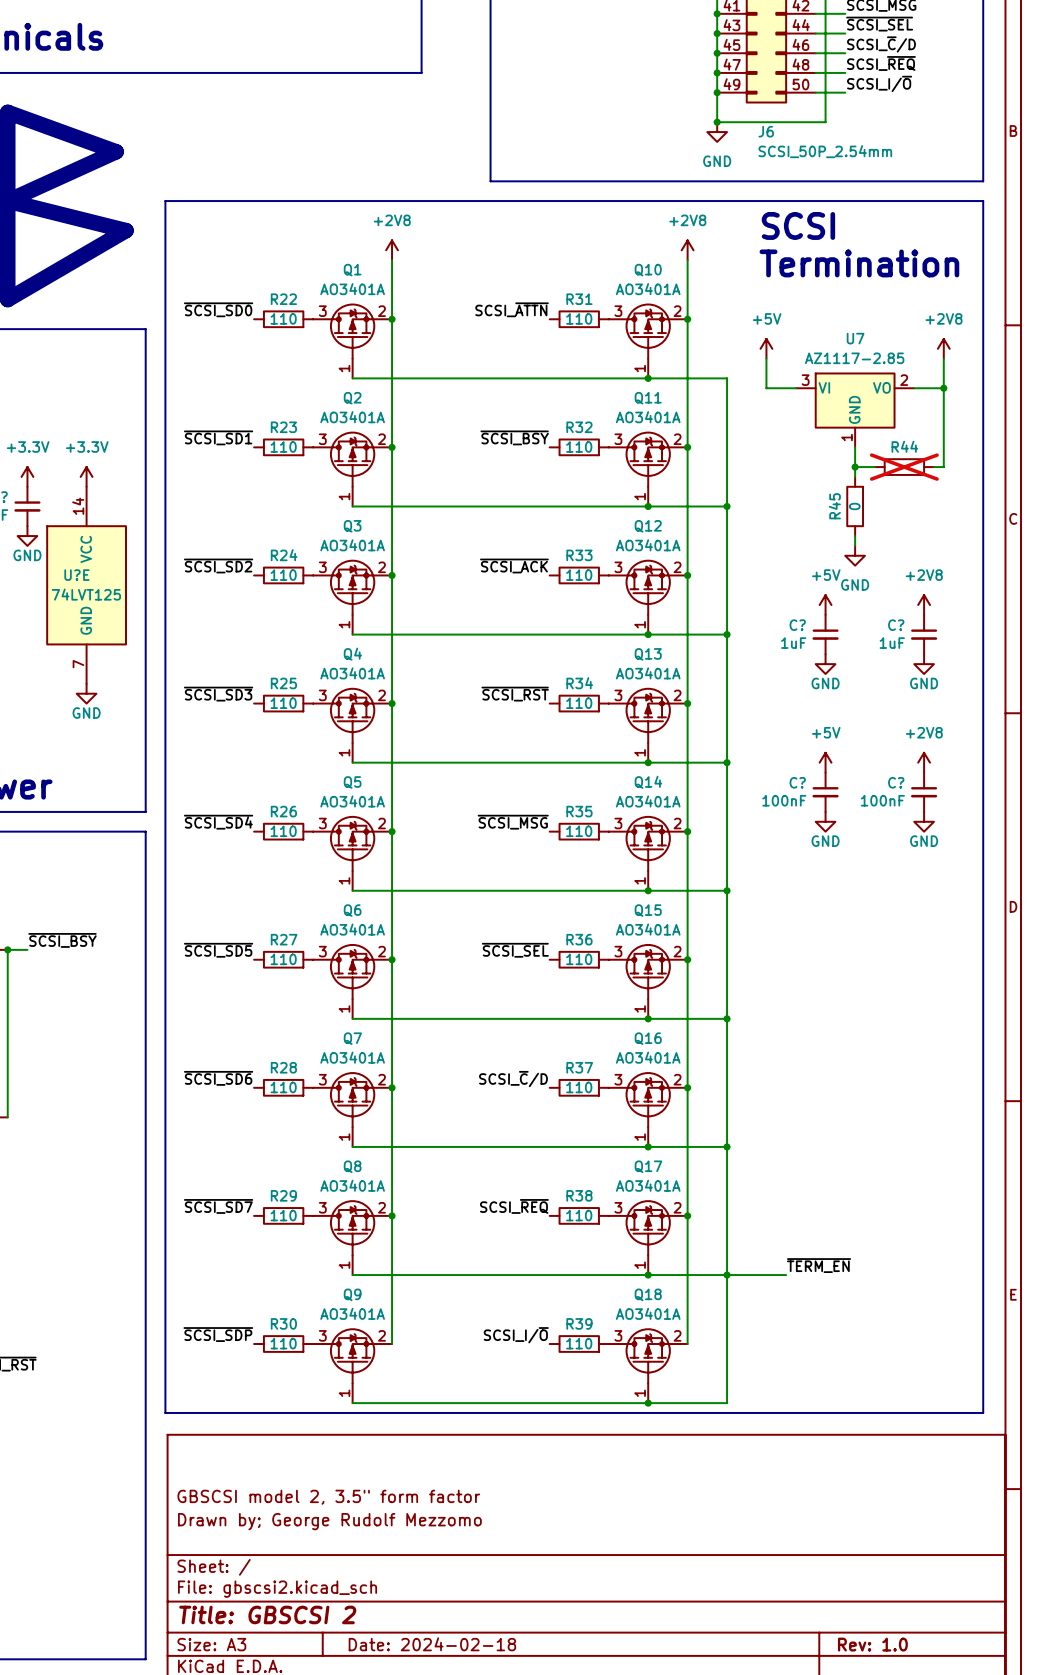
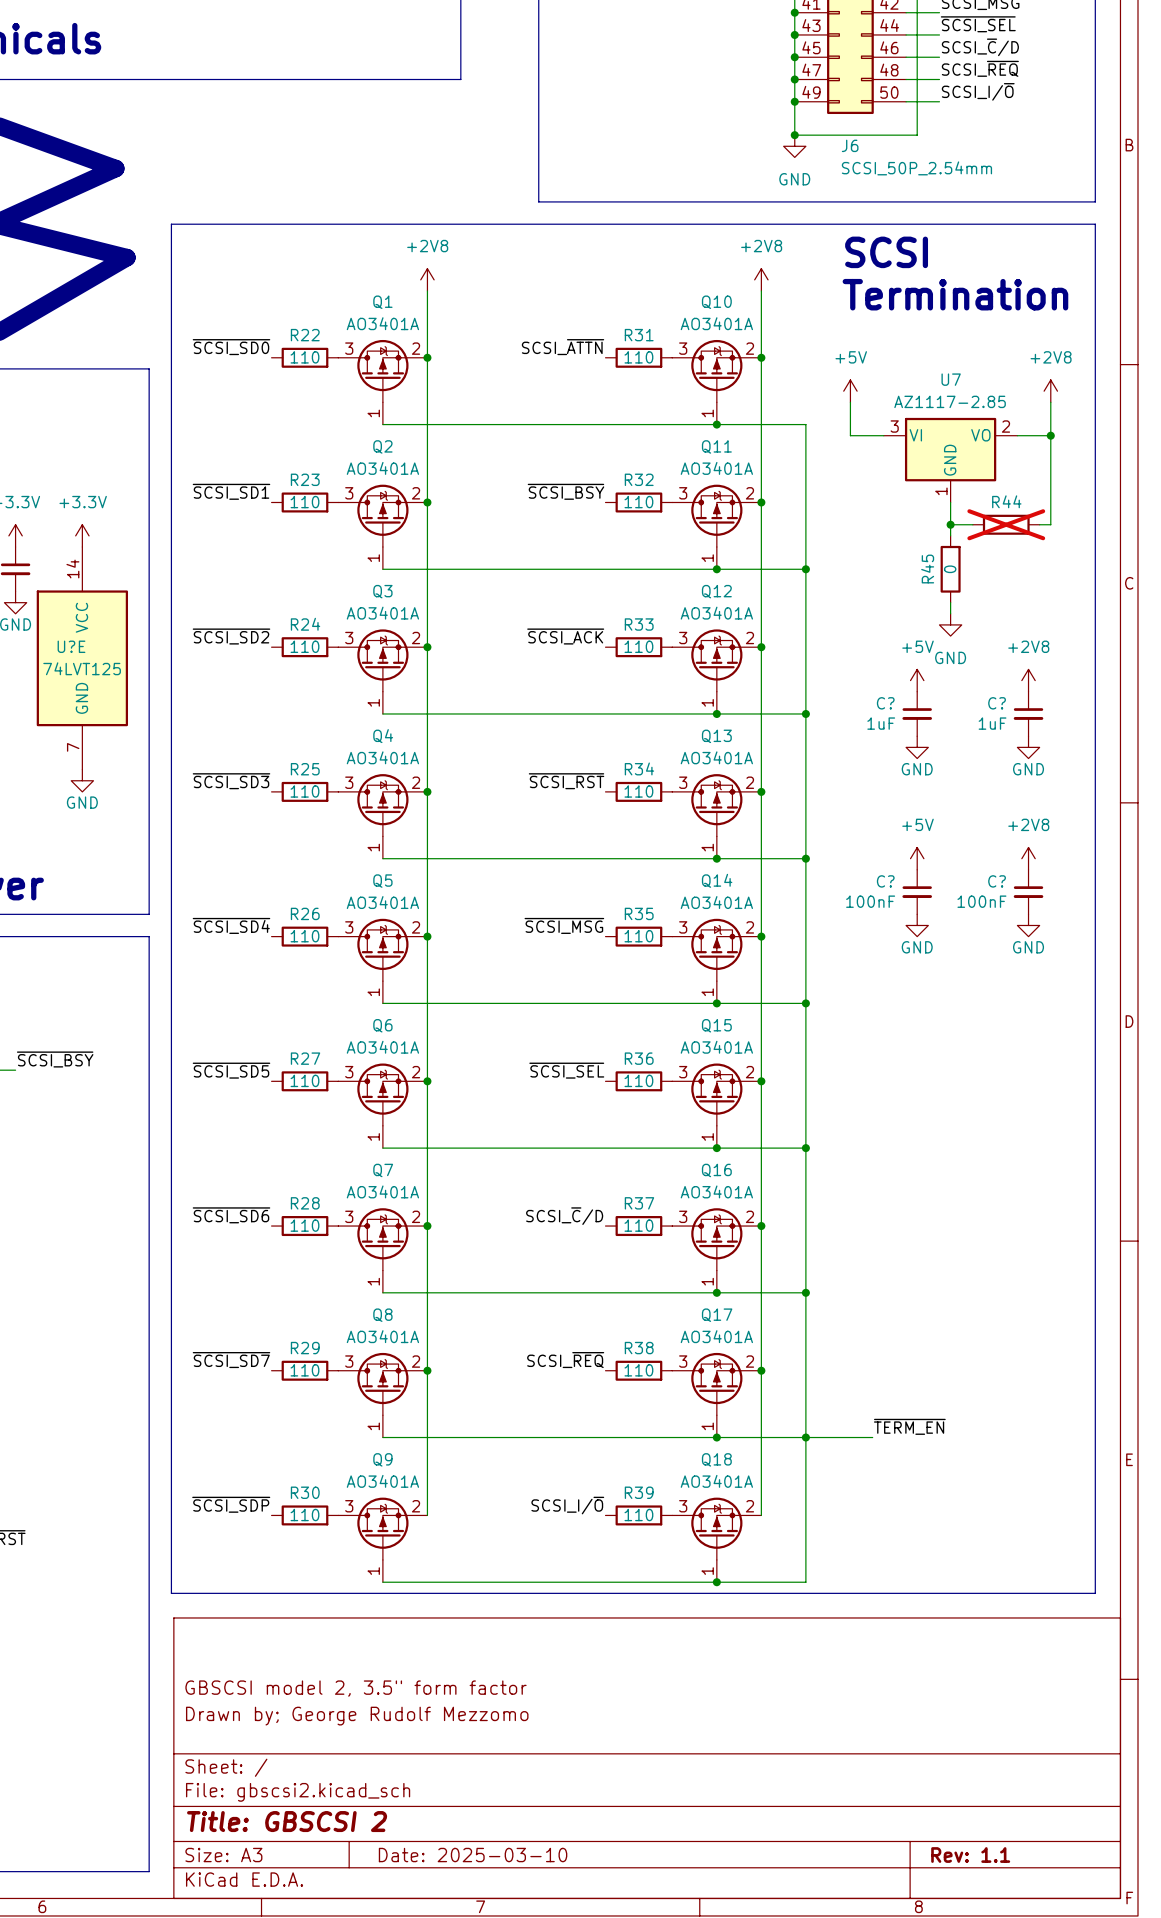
title block: Date: 2024-02-18 (432, 1644) -> Date: 2025-03-10 (473, 1855)
title block: Rev: 1.0 (872, 1644) -> Rev: 1.1 (970, 1855)

